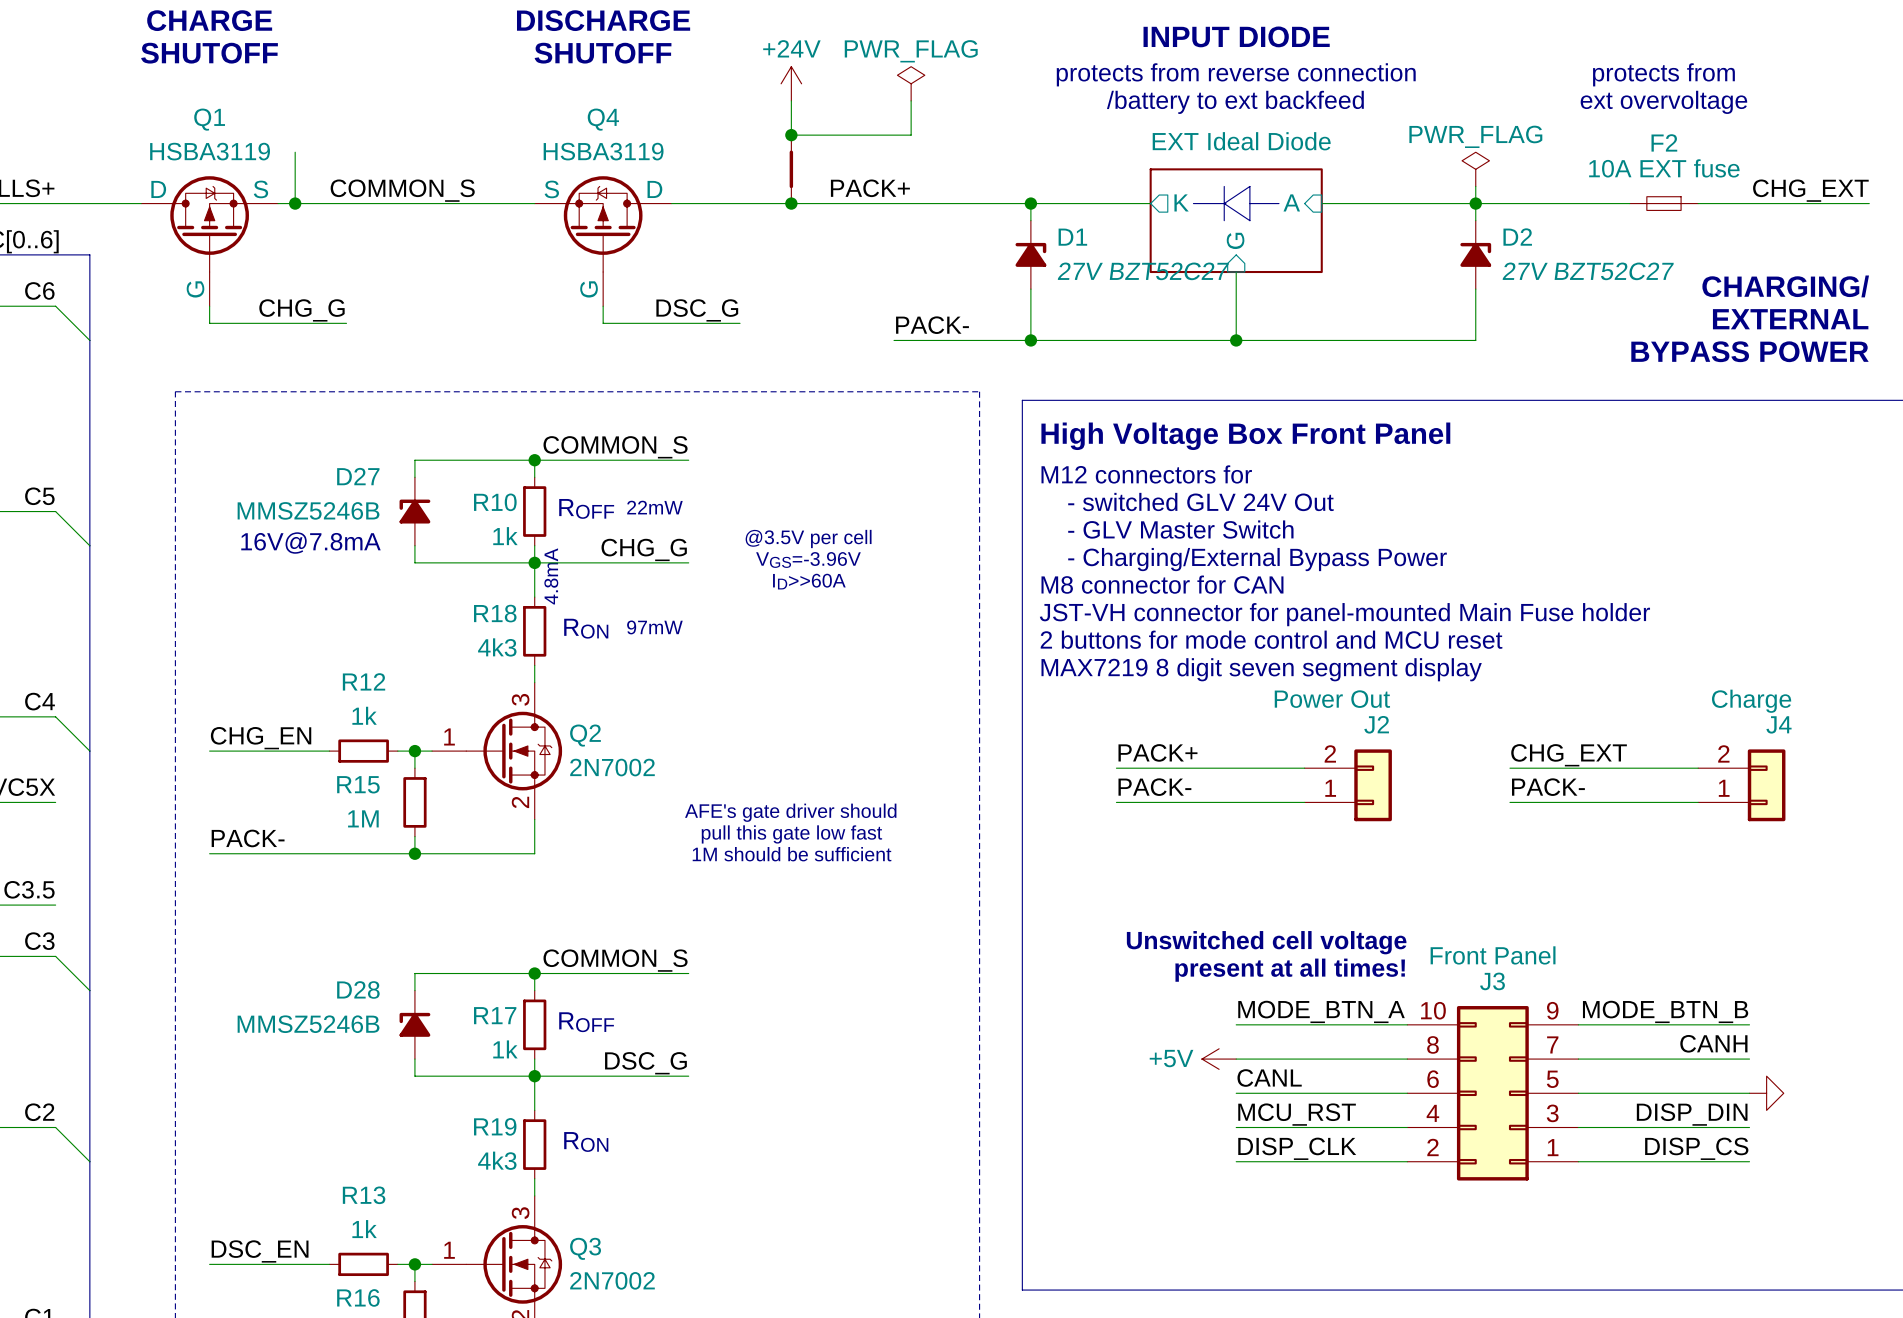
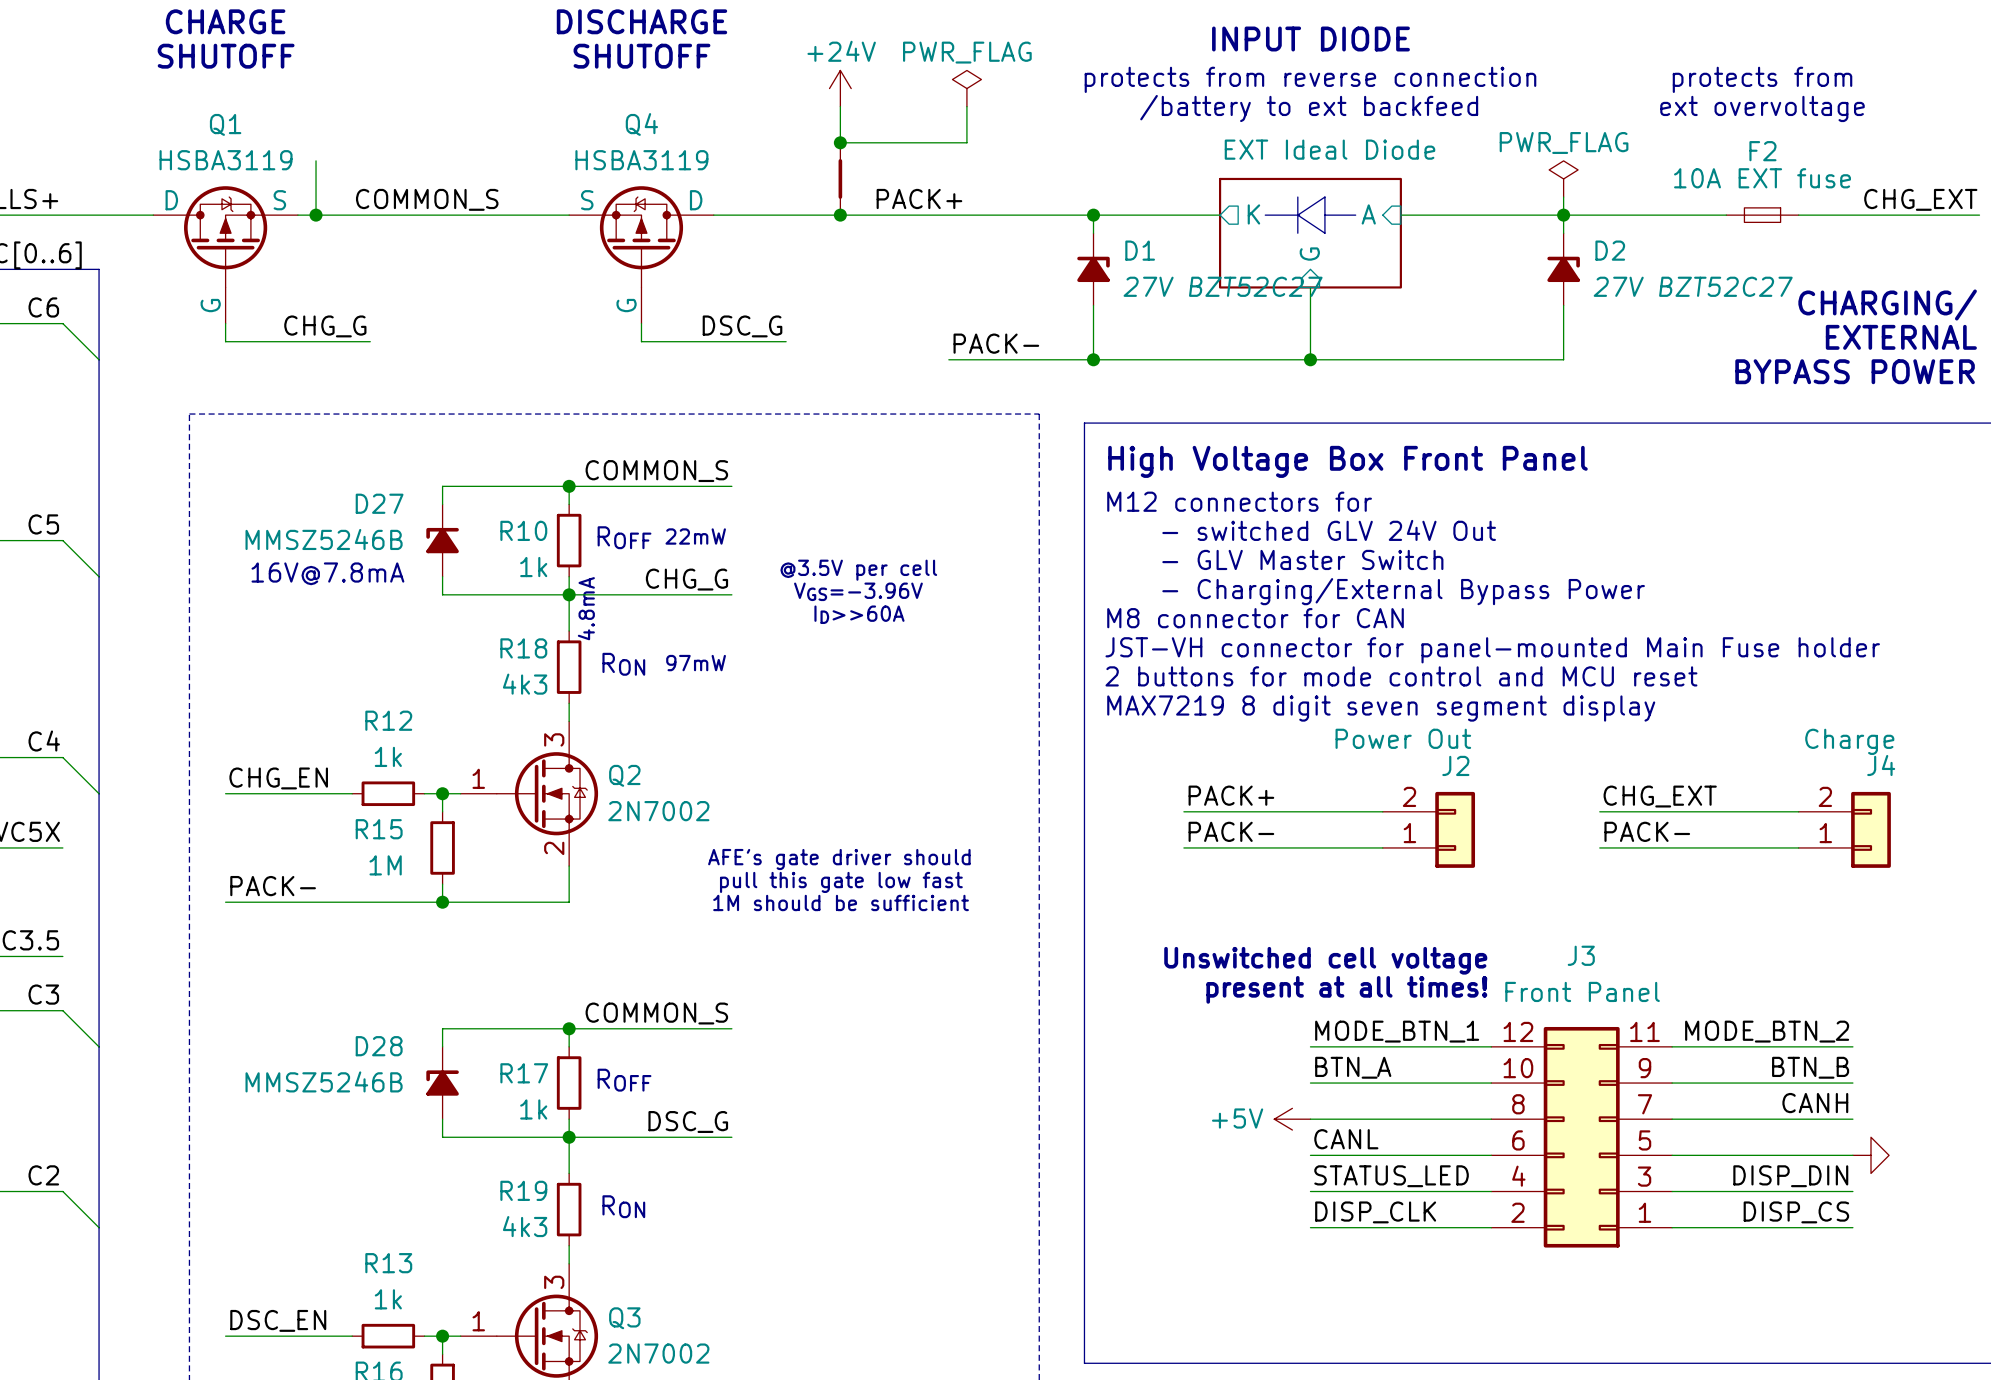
text: none -> Unswitched cell voltage (1325, 960)
text: Unswitched cell voltage (1266, 942) -> present at all times! (1346, 989)
text: present at all times! (1290, 970) -> none
label: none -> MODE_BTN_1 (1397, 1031)
label: none -> MODE_BTN_2 (1767, 1031)
J3 name position: J3 (1492, 981) -> J3 (1581, 955)
wire: none -> (1310, 1046) (1491, 1046)
wire: none -> (1672, 1046) (1852, 1046)
J3 symbol: [1407, 1006, 1579, 1181] -> [1491, 1026, 1673, 1248]
label: MODE_BTN_A (1321, 1011) -> BTN_A (1353, 1067)
label: MODE_BTN_B (1665, 1011) -> BTN_B (1810, 1067)
label: MCU_RST (1297, 1114) -> STATUS_LED (1391, 1176)

